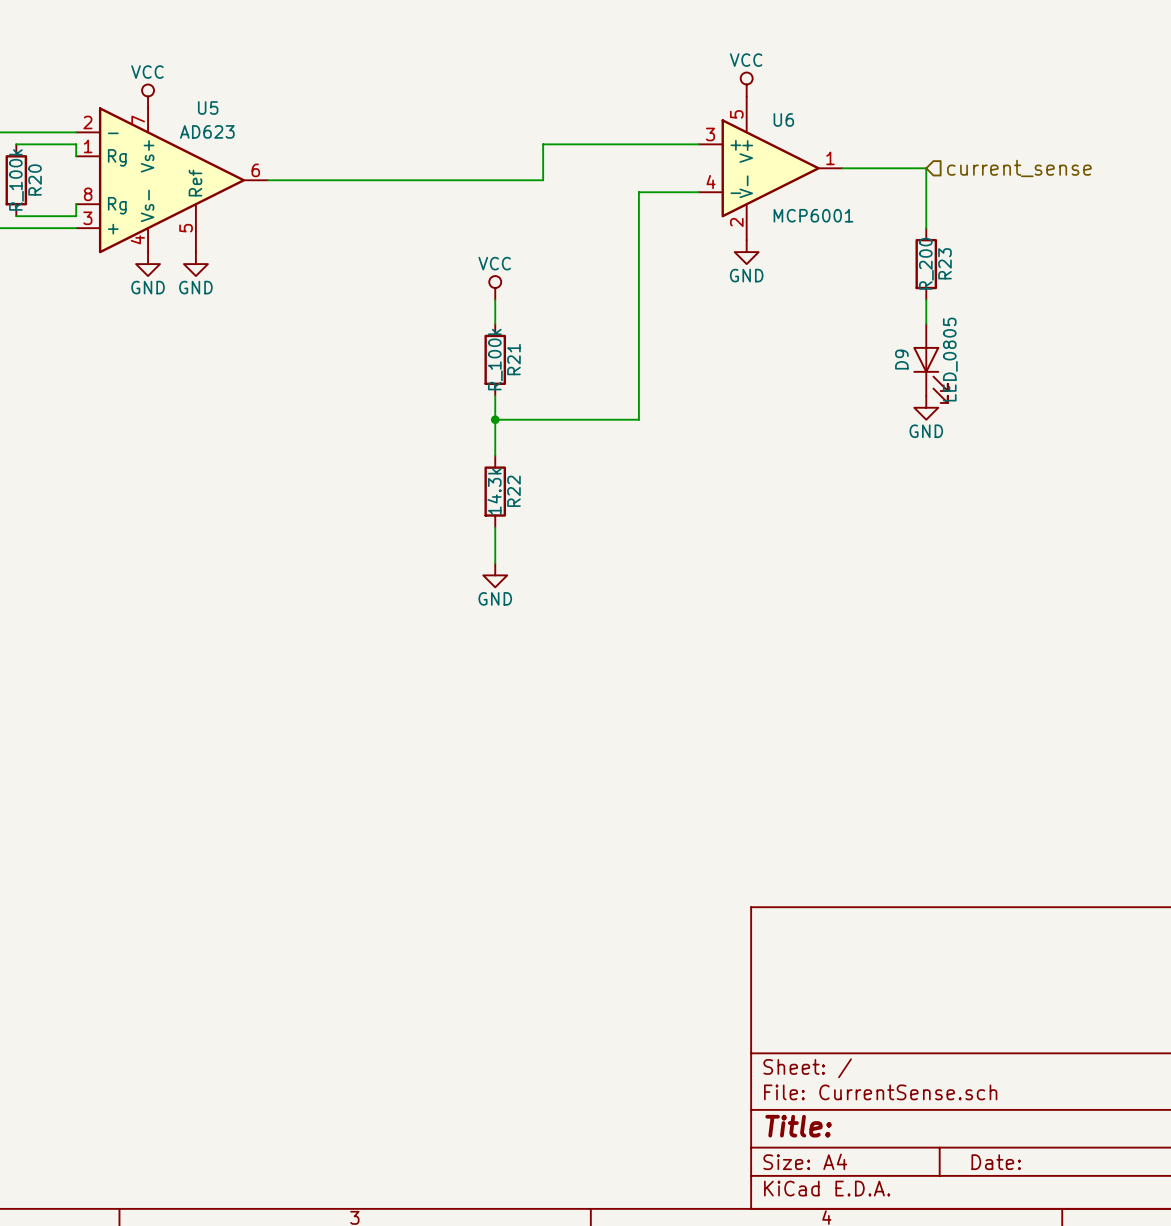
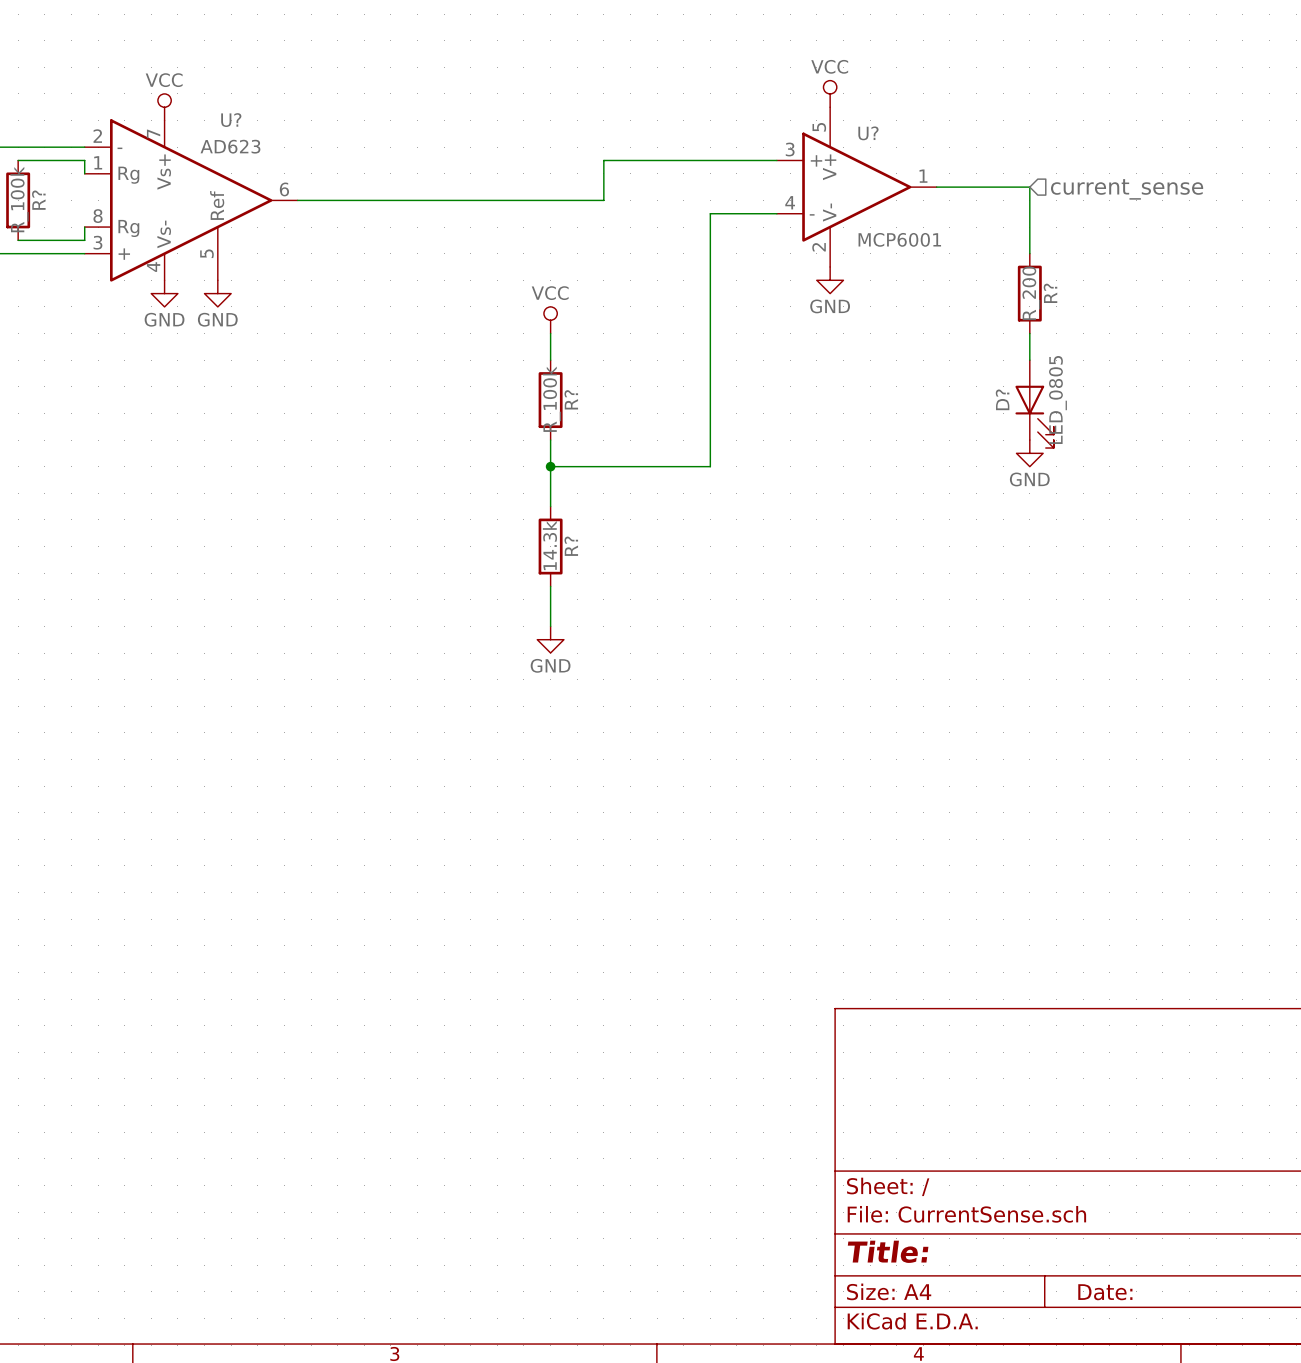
U5 name: U5 (208, 107) -> U? (231, 120)
U6 name: U6 (783, 119) -> U? (868, 133)
R20 name: R20 (35, 179) -> R? (38, 200)
R23 name: R23 (944, 263) -> R? (1050, 293)
R21 name: R21 (513, 359) -> R? (571, 399)
D9 name: D9 (901, 359) -> D? (1002, 399)
R22 name: R22 (513, 491) -> R? (571, 546)

